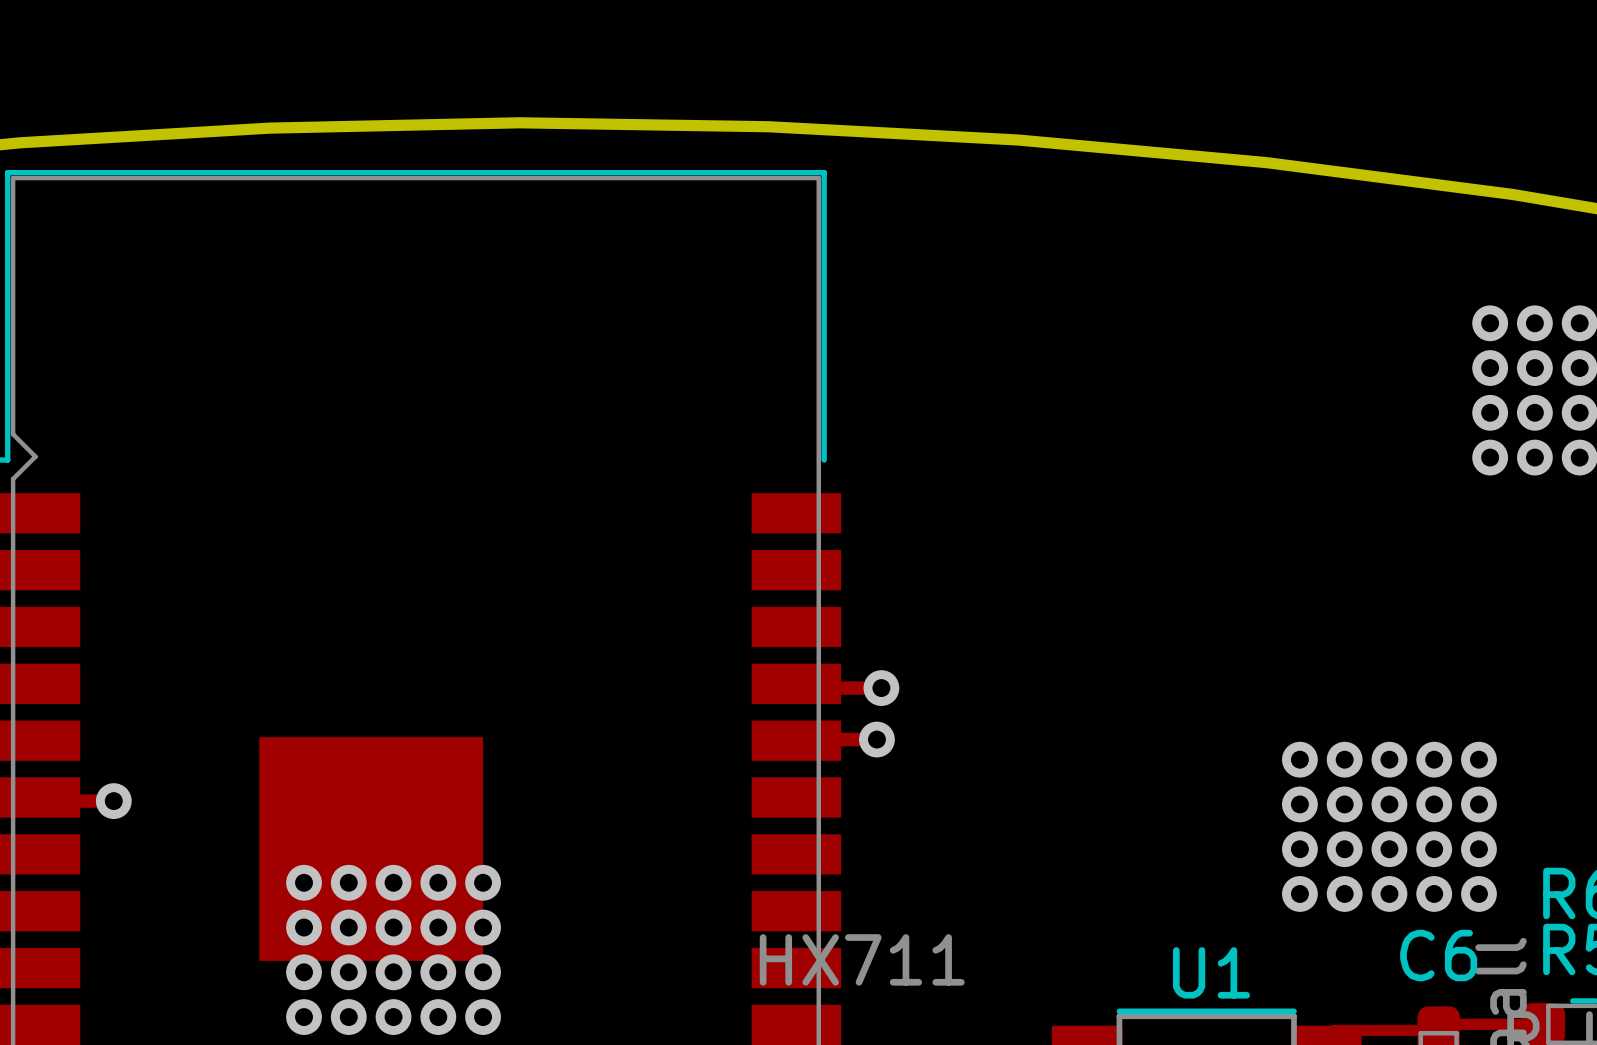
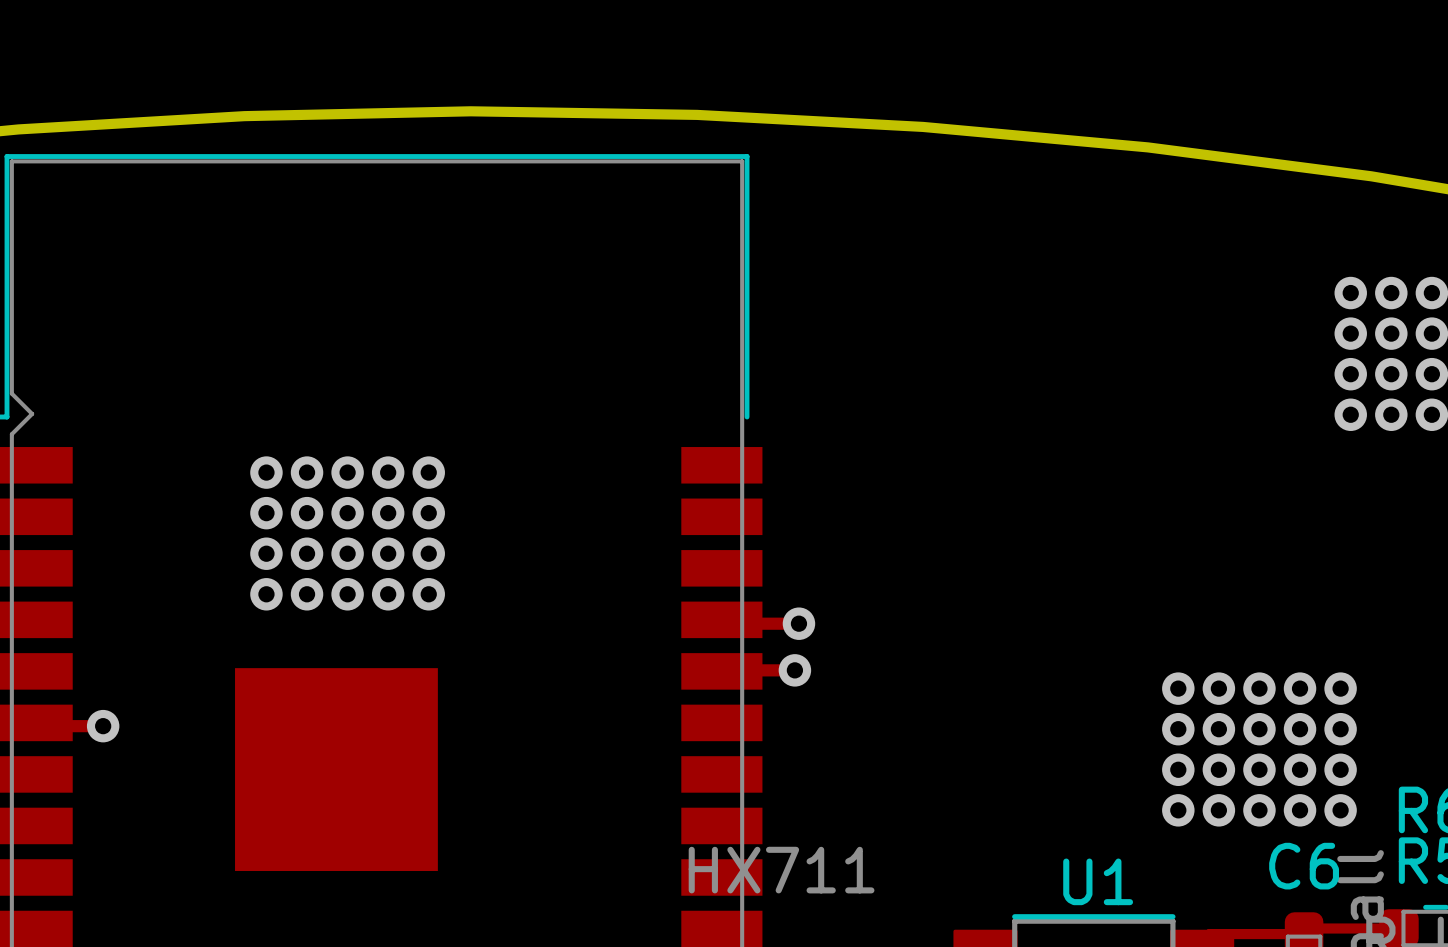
via: none -> (266, 472)
via: none -> (307, 472)
via: none -> (347, 472)
via: none -> (388, 472)
via: none -> (428, 472)
via: none -> (266, 513)
via: none -> (307, 513)
via: none -> (347, 513)
via: none -> (388, 513)
via: none -> (428, 513)
via: none -> (266, 553)
via: none -> (307, 553)
via: none -> (347, 553)
via: none -> (388, 553)
via: none -> (428, 553)
via: none -> (266, 594)
via: none -> (307, 594)
via: none -> (347, 594)
via: none -> (388, 594)
via: none -> (428, 594)
via: (304, 882) -> none
via: (348, 882) -> none
via: (393, 882) -> none
via: (438, 882) -> none
via: (483, 882) -> none
via: (304, 927) -> none
via: (348, 927) -> none
via: (393, 927) -> none
via: (438, 927) -> none
via: (483, 927) -> none
via: (304, 972) -> none
via: (348, 972) -> none
via: (393, 972) -> none
via: (438, 972) -> none
via: (483, 972) -> none
via: (304, 1017) -> none
via: (348, 1017) -> none
via: (393, 1017) -> none
via: (438, 1017) -> none
via: (483, 1017) -> none

